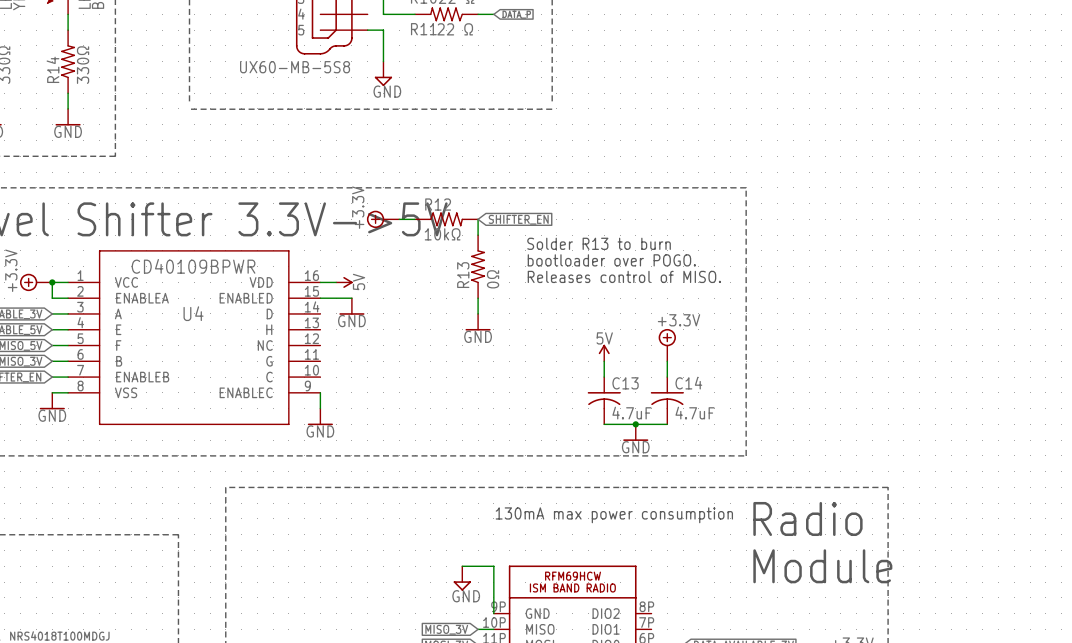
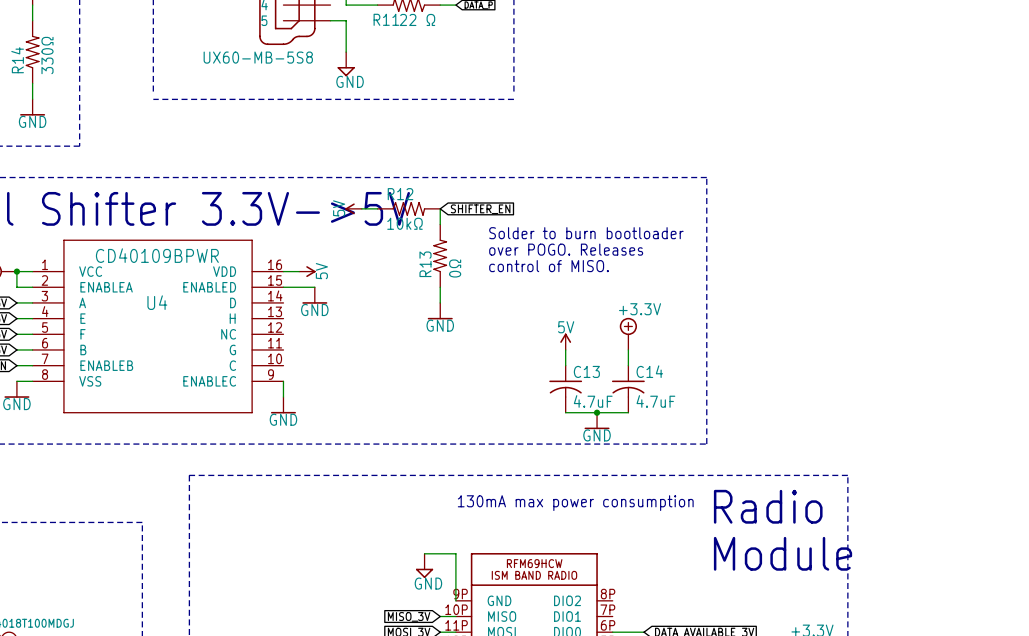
power symbol: +3.3V (383, 219) -> none
power symbol: none -> 5V (353, 208)
text: Solder R13 to burn (599, 243) -> Solder to burn bootloader (586, 233)
text: bootloader over POGO. (611, 260) -> over POGO. Releases (566, 249)
text: Releases control of MISO. (624, 276) -> control of MISO. (549, 266)

